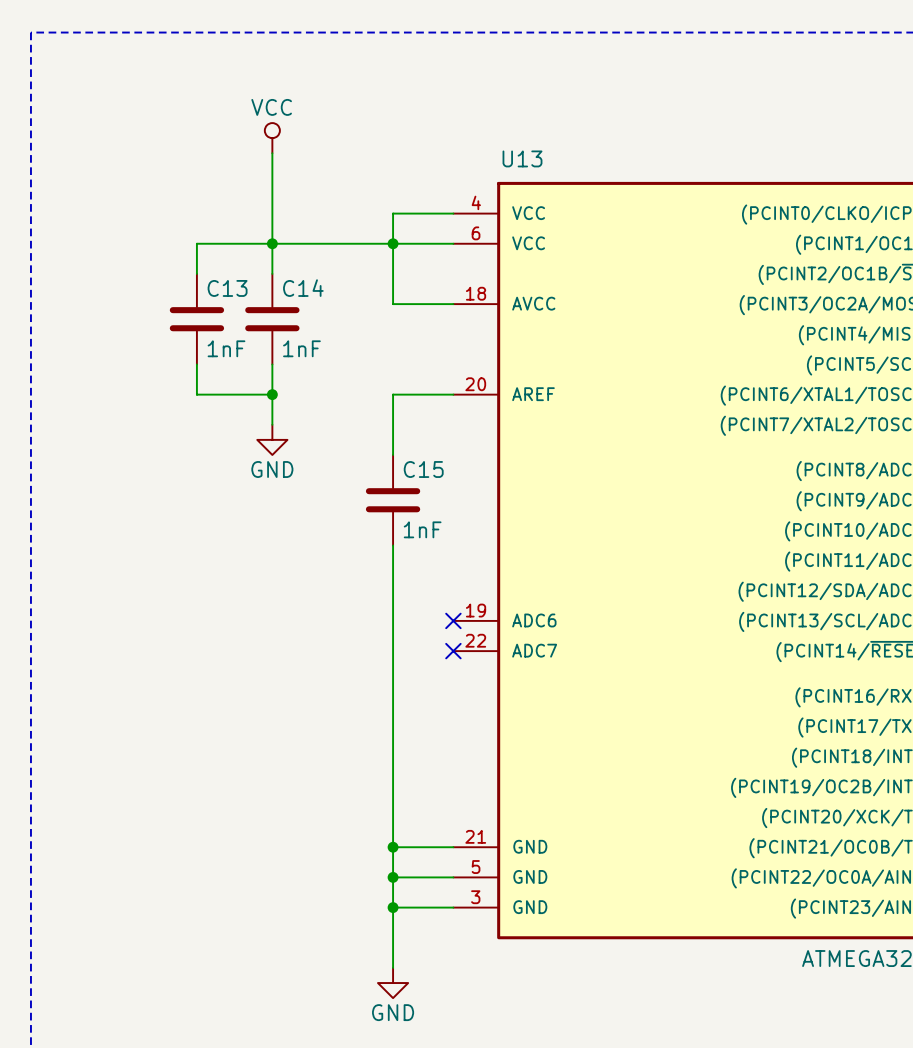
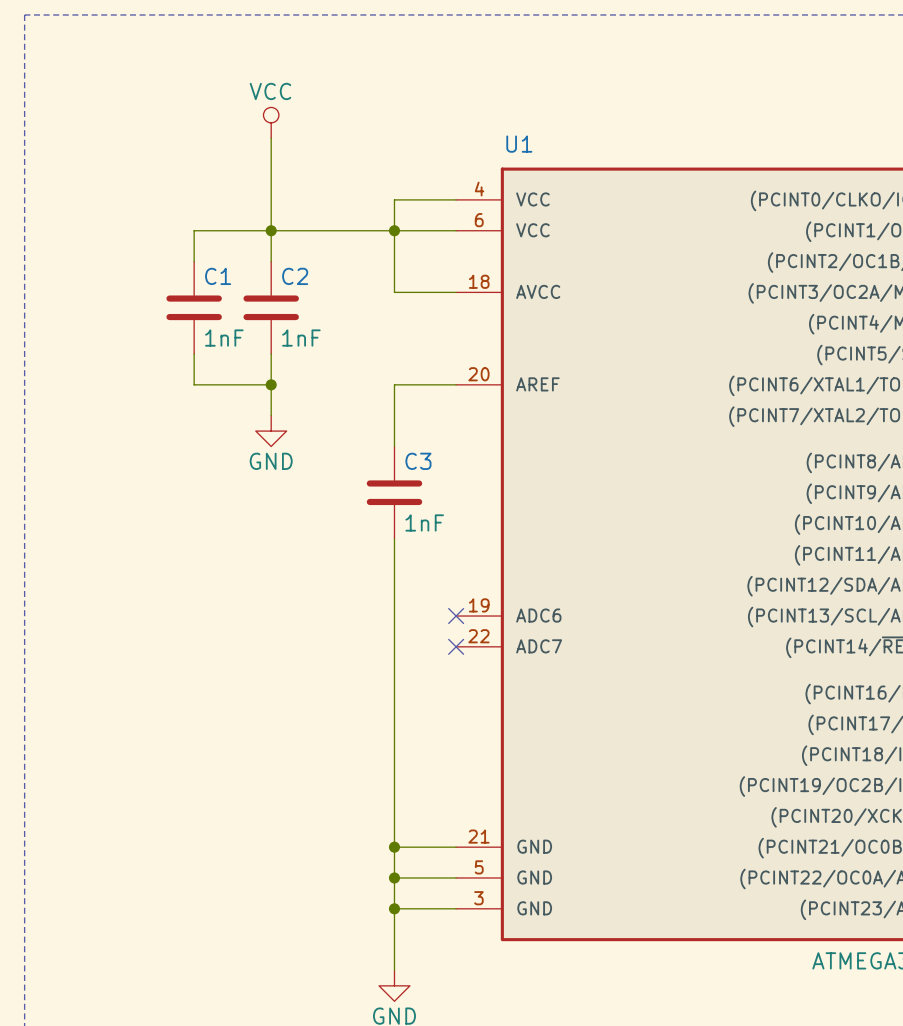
U13 name: U13 (522, 158) -> U1 (519, 144)
C13 name: C13 (227, 288) -> C1 (218, 276)
C14 name: C14 (303, 288) -> C2 (295, 276)
C15 name: C15 (423, 469) -> C3 (418, 461)

